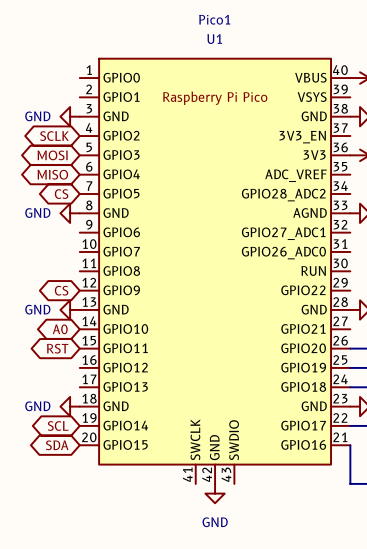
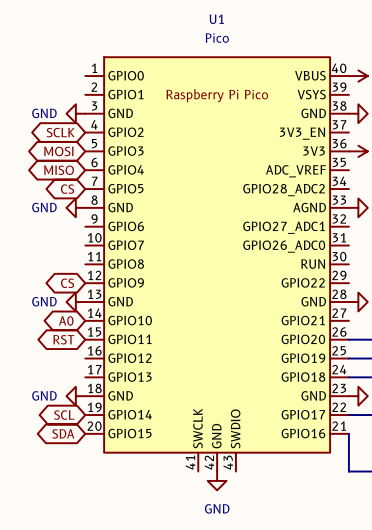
Pico1 name: Pico1 (214, 19) -> U1 (216, 19)
Pico1 value: U1 (214, 39) -> Pico (217, 38)

